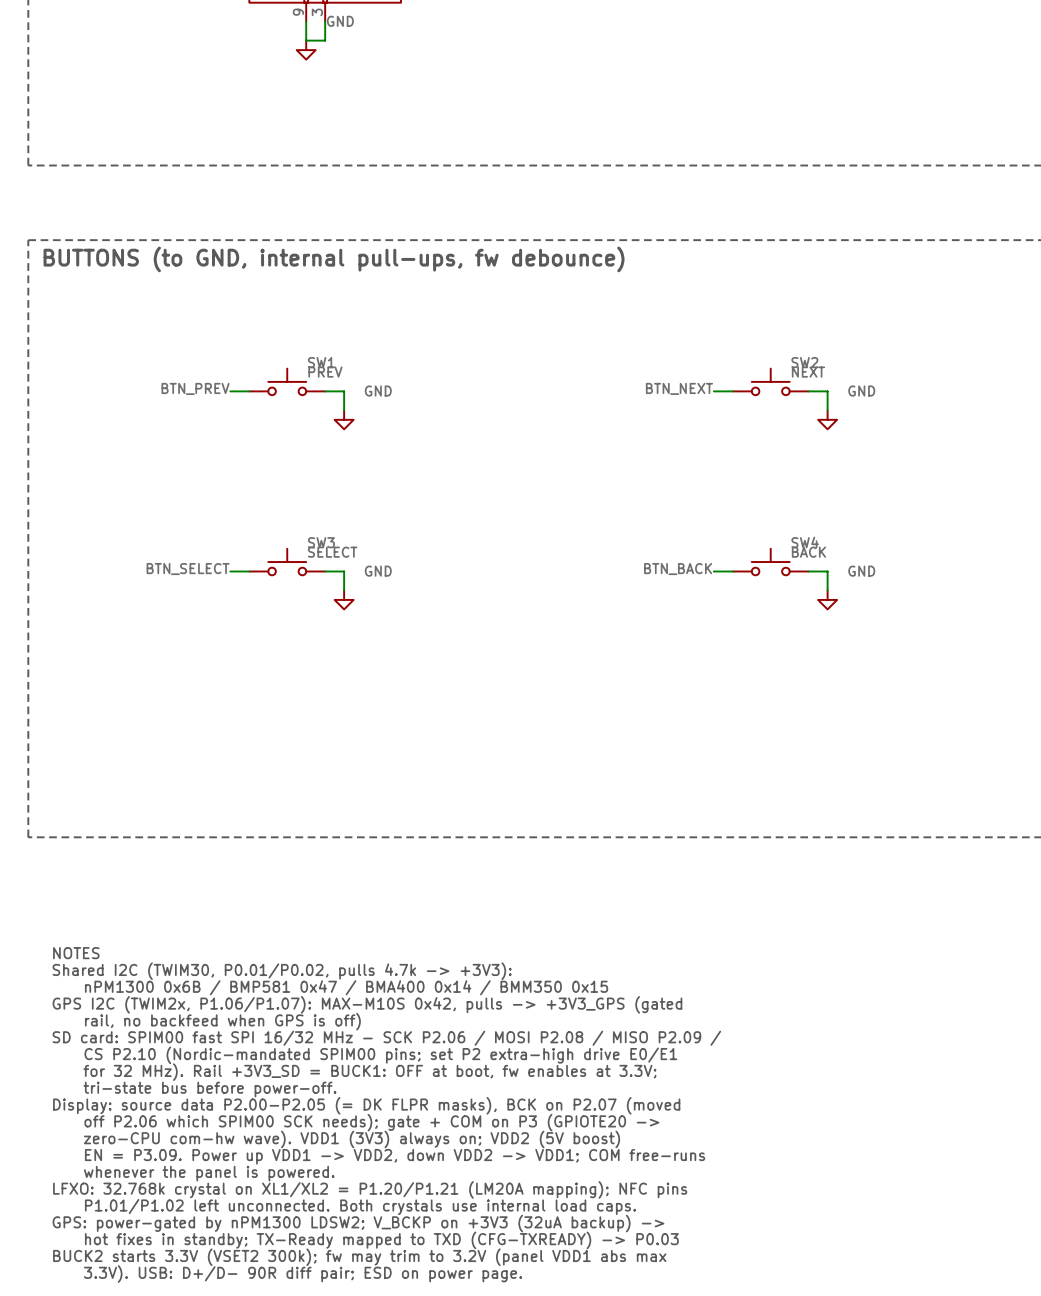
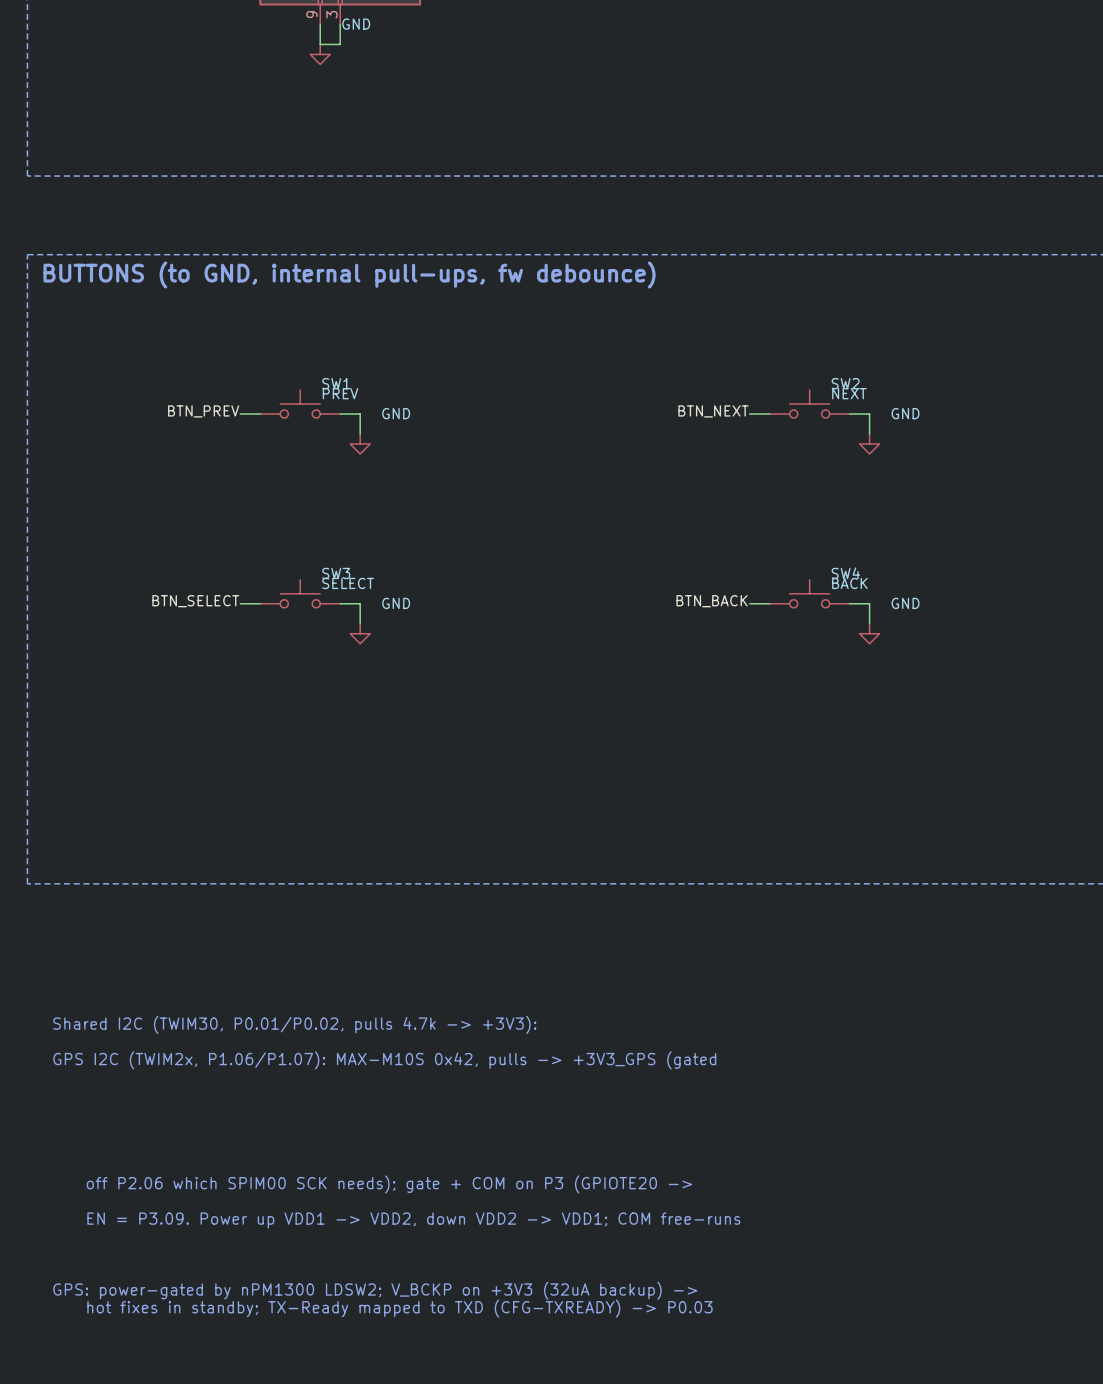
text: NOTES (76, 953) -> none
text: nPM1300 0x6B / BMP581 0x47 / BMA400 0x14 / BMM350 0x15 (346, 987) -> none
text: rail, no backfeed when GPS is off) (222, 1021) -> none
text: SD card: SPIM00 fast SPI 16/32 MHz - SCK P2.06 / MOSI P2.08 / MISO P2.09 / (386, 1038) -> none
text: CS P2.10 (Nordic-mandated SPIM00 pins; set P2 extra-high drive E0/E1 (380, 1055) -> none
text: for 32 MHz). Rail +3V3_SD = BUCK1: OFF at boot, fw enables at 3.3V; (369, 1072) -> none
text: tri-state bus before power-off. (209, 1089) -> none
text: Display: source data P2.00-P2.05 (= DK FLPR masks), BCK on P2.07 (moved (366, 1105) -> none
text: zero-CPU com-hw wave). VDD1 (3V3) always on; VDD2 (5V boost) (352, 1139) -> none
text: whenever the panel is powered. (209, 1173) -> none
text: LFXO: 32.768k crystal on XL1/XL2 = P1.20/P1.21 (LM20A mapping); NFC pins (370, 1189) -> none
text: P1.01/P1.02 left unconnected. Both crystals use internal load caps. (360, 1207) -> none
text: BUCK2 starts 3.3V (VSET2 300k); fw may trim to 3.2V (panel VDD1 abs max (359, 1257) -> none
text: 3.3V). USB: D+/D- 90R diff pair; ESD on power page. (303, 1274) -> none

